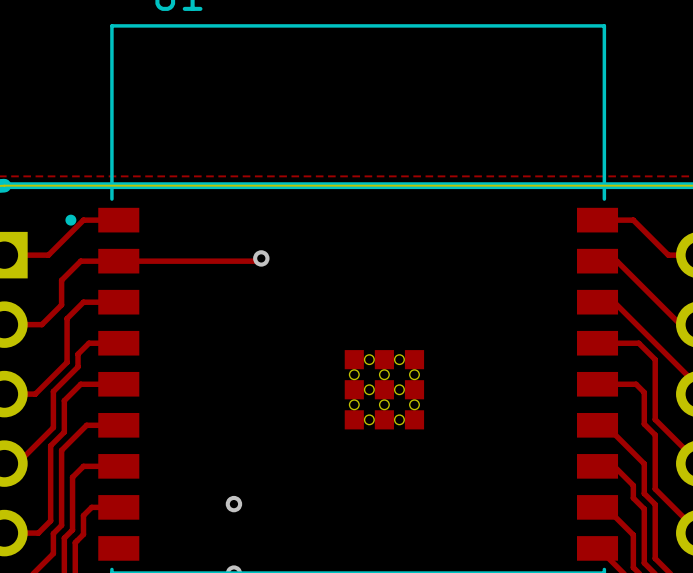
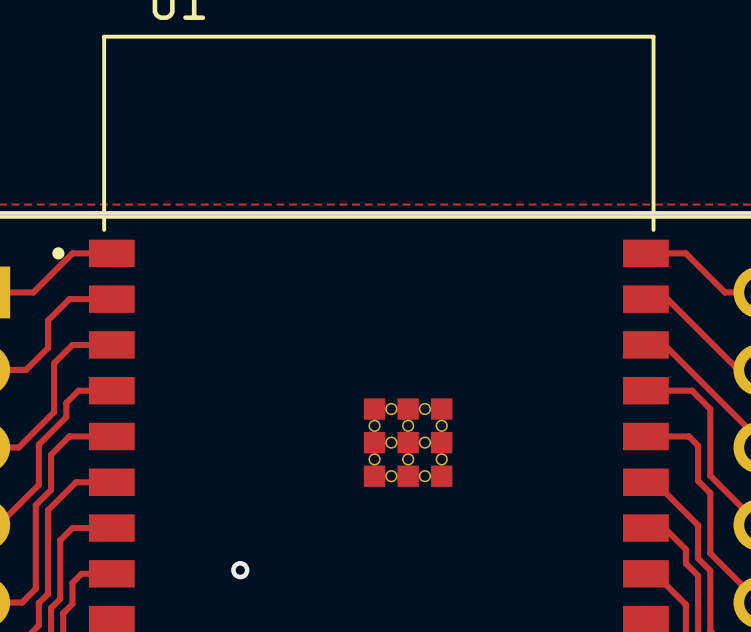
track: (261, 258) (258, 261) (118, 261) -> none
via: (261, 258) -> none

